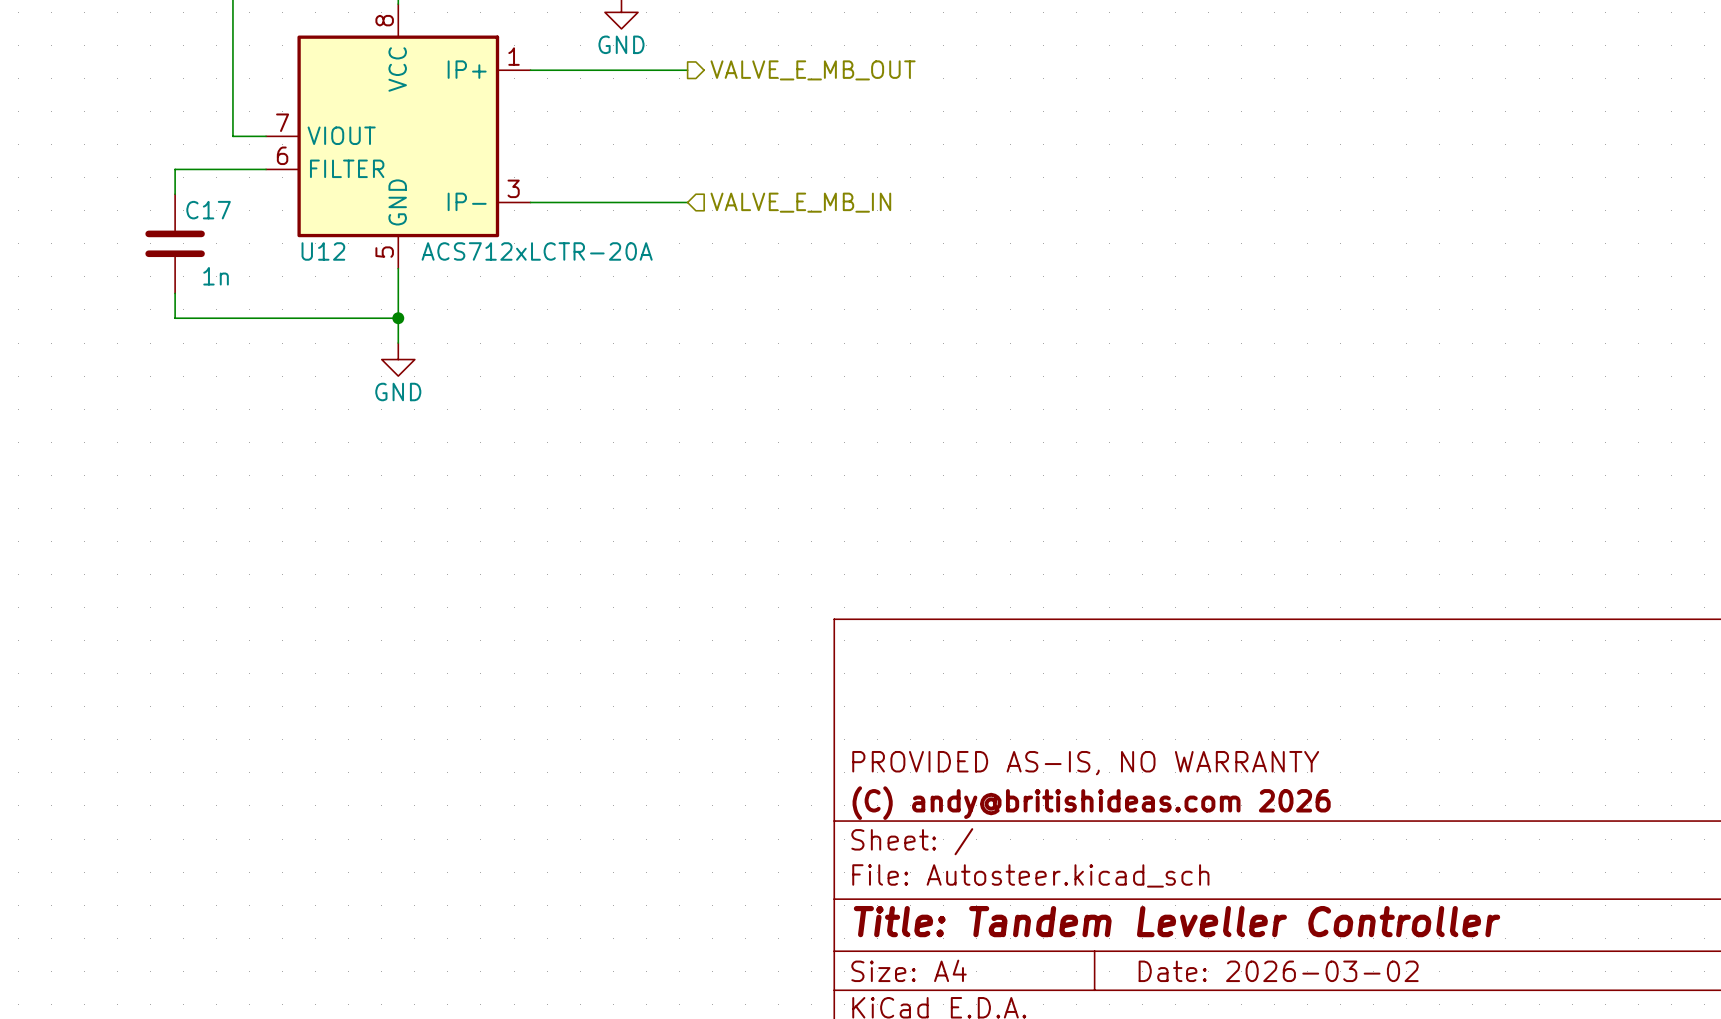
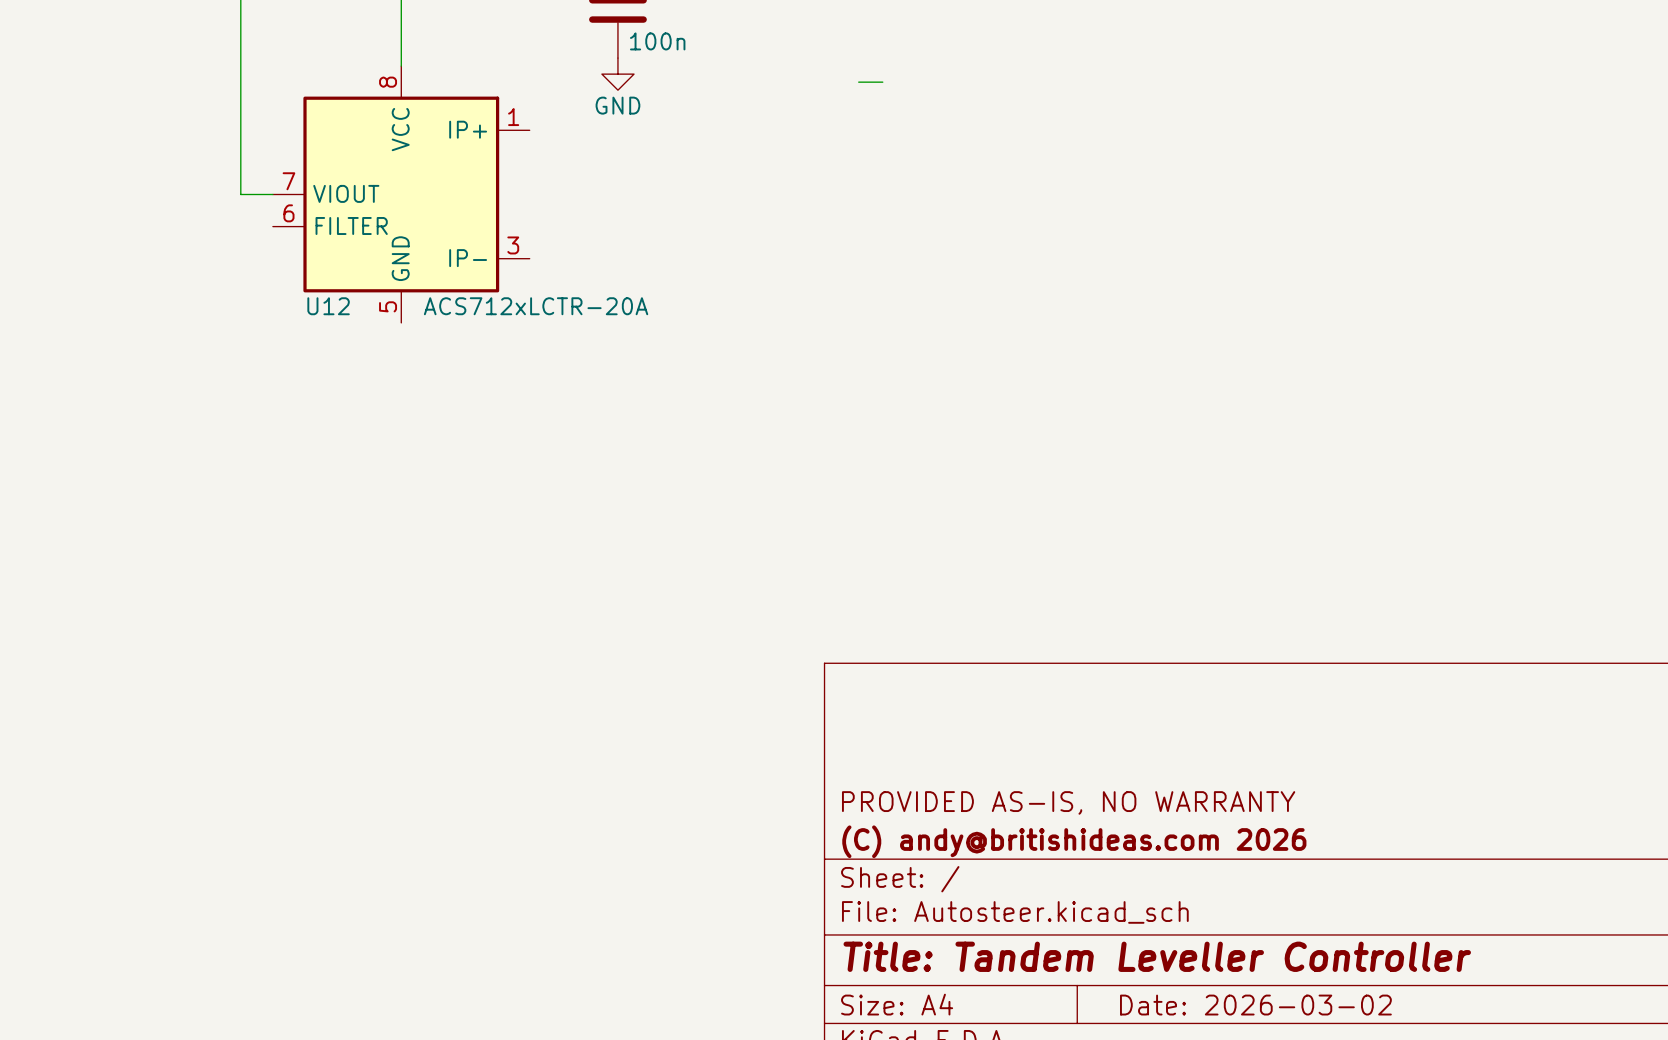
wire: none -> (858, 82) (882, 82)
wire: (530, 70) (687, 70) -> none
hierarchical label: VALVE_E_MB_OUT (813, 70) -> none
wire: (266, 169) (175, 169) (175, 194) -> none
wire: (530, 202) (687, 202) -> none
hierarchical label: VALVE_E_MB_IN (800, 202) -> none
C17: 1n (175, 243) -> none
wire: (398, 268) (398, 343) -> none
wire: (175, 293) (175, 318) (398, 318) -> none
junction: (398, 318) -> none
power symbol: GND (398, 359) -> none

